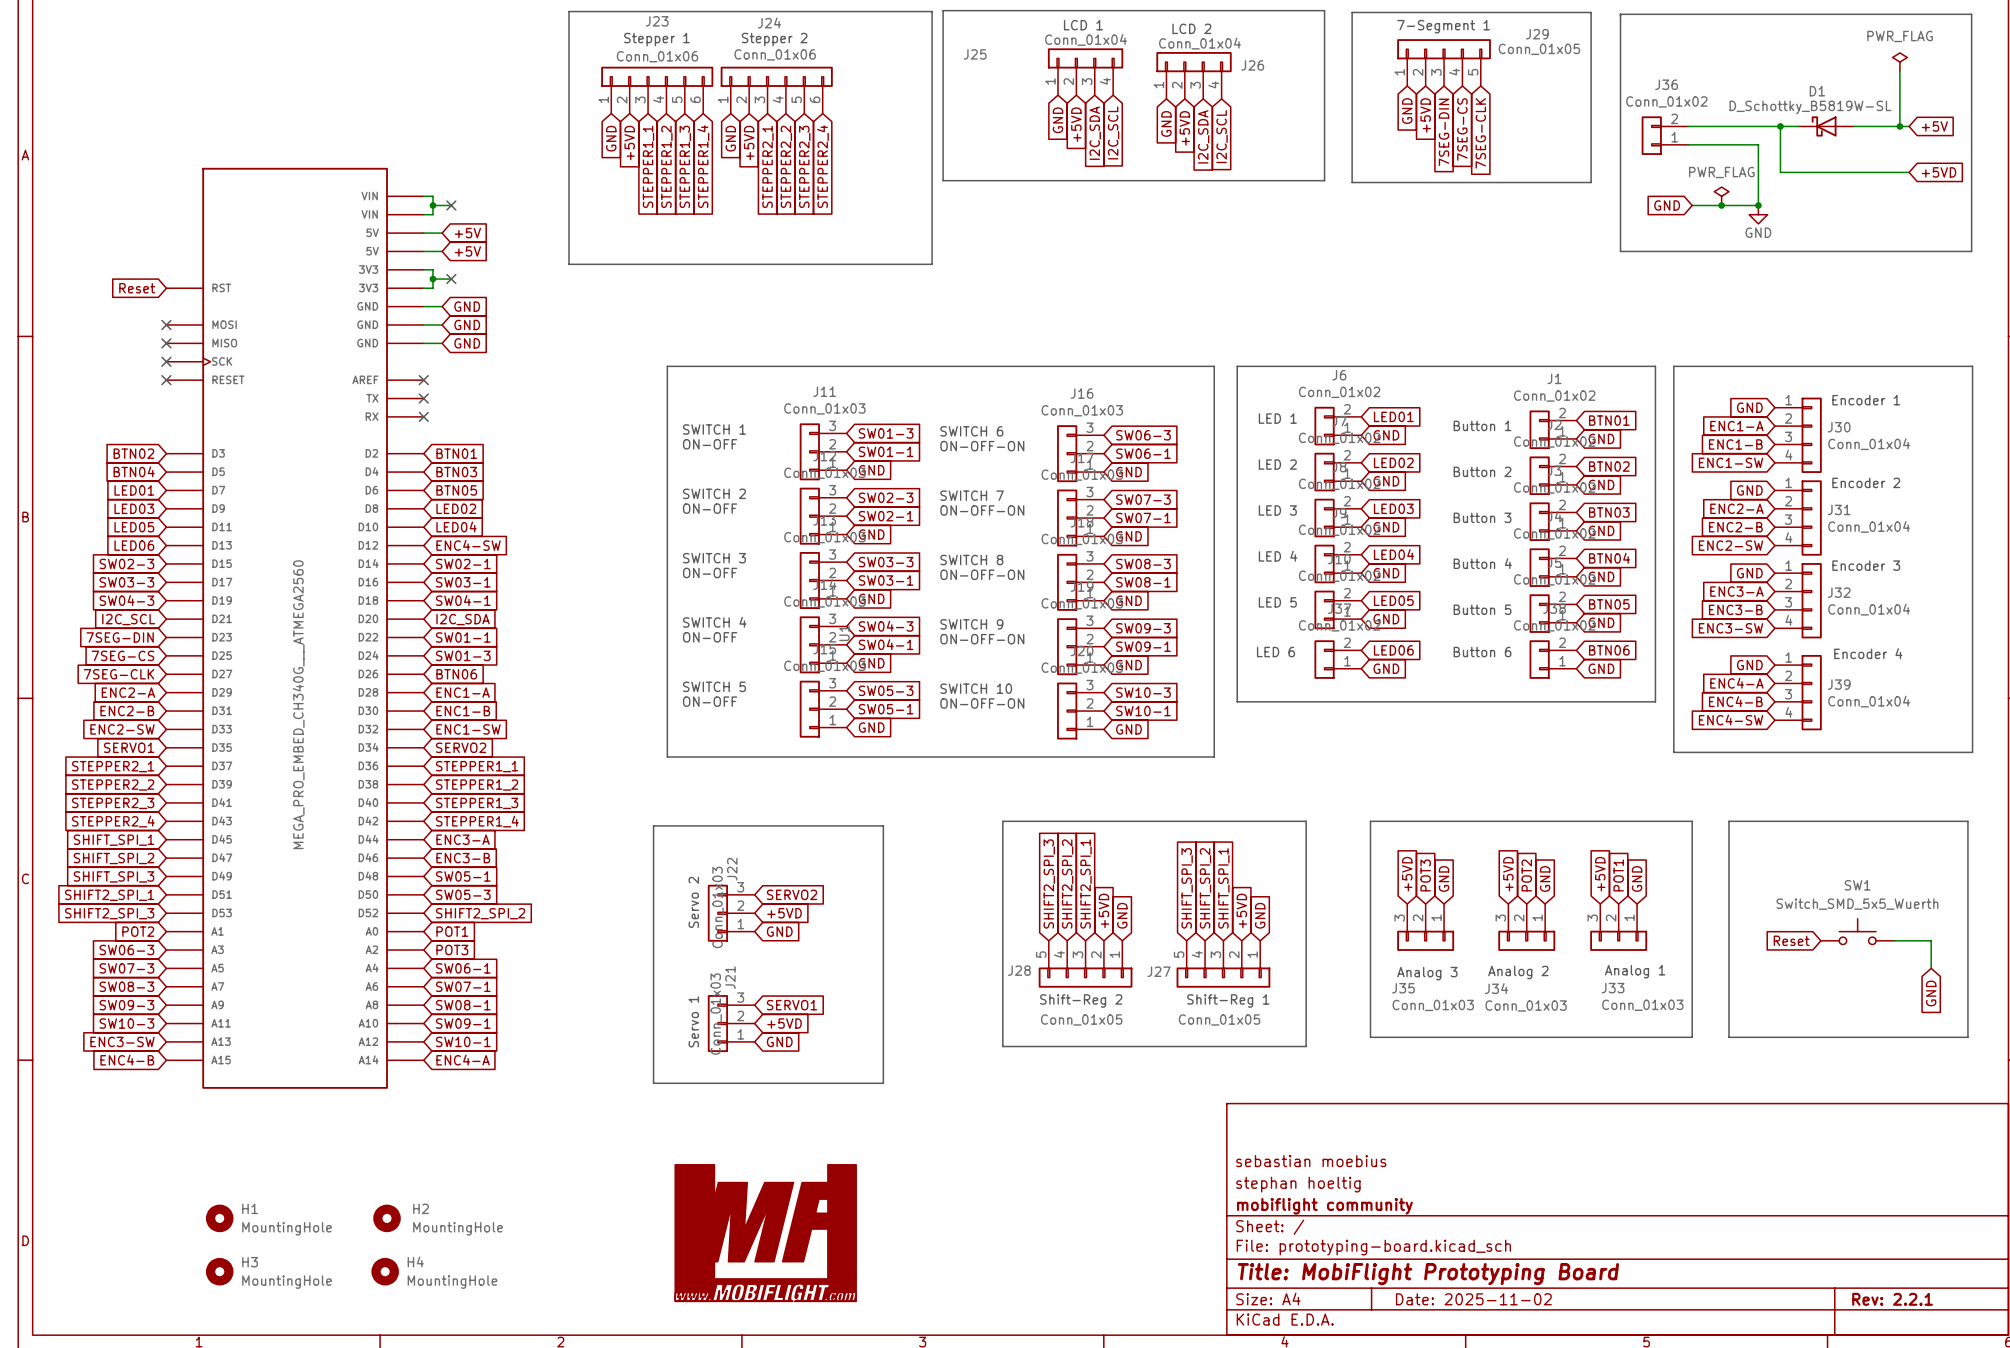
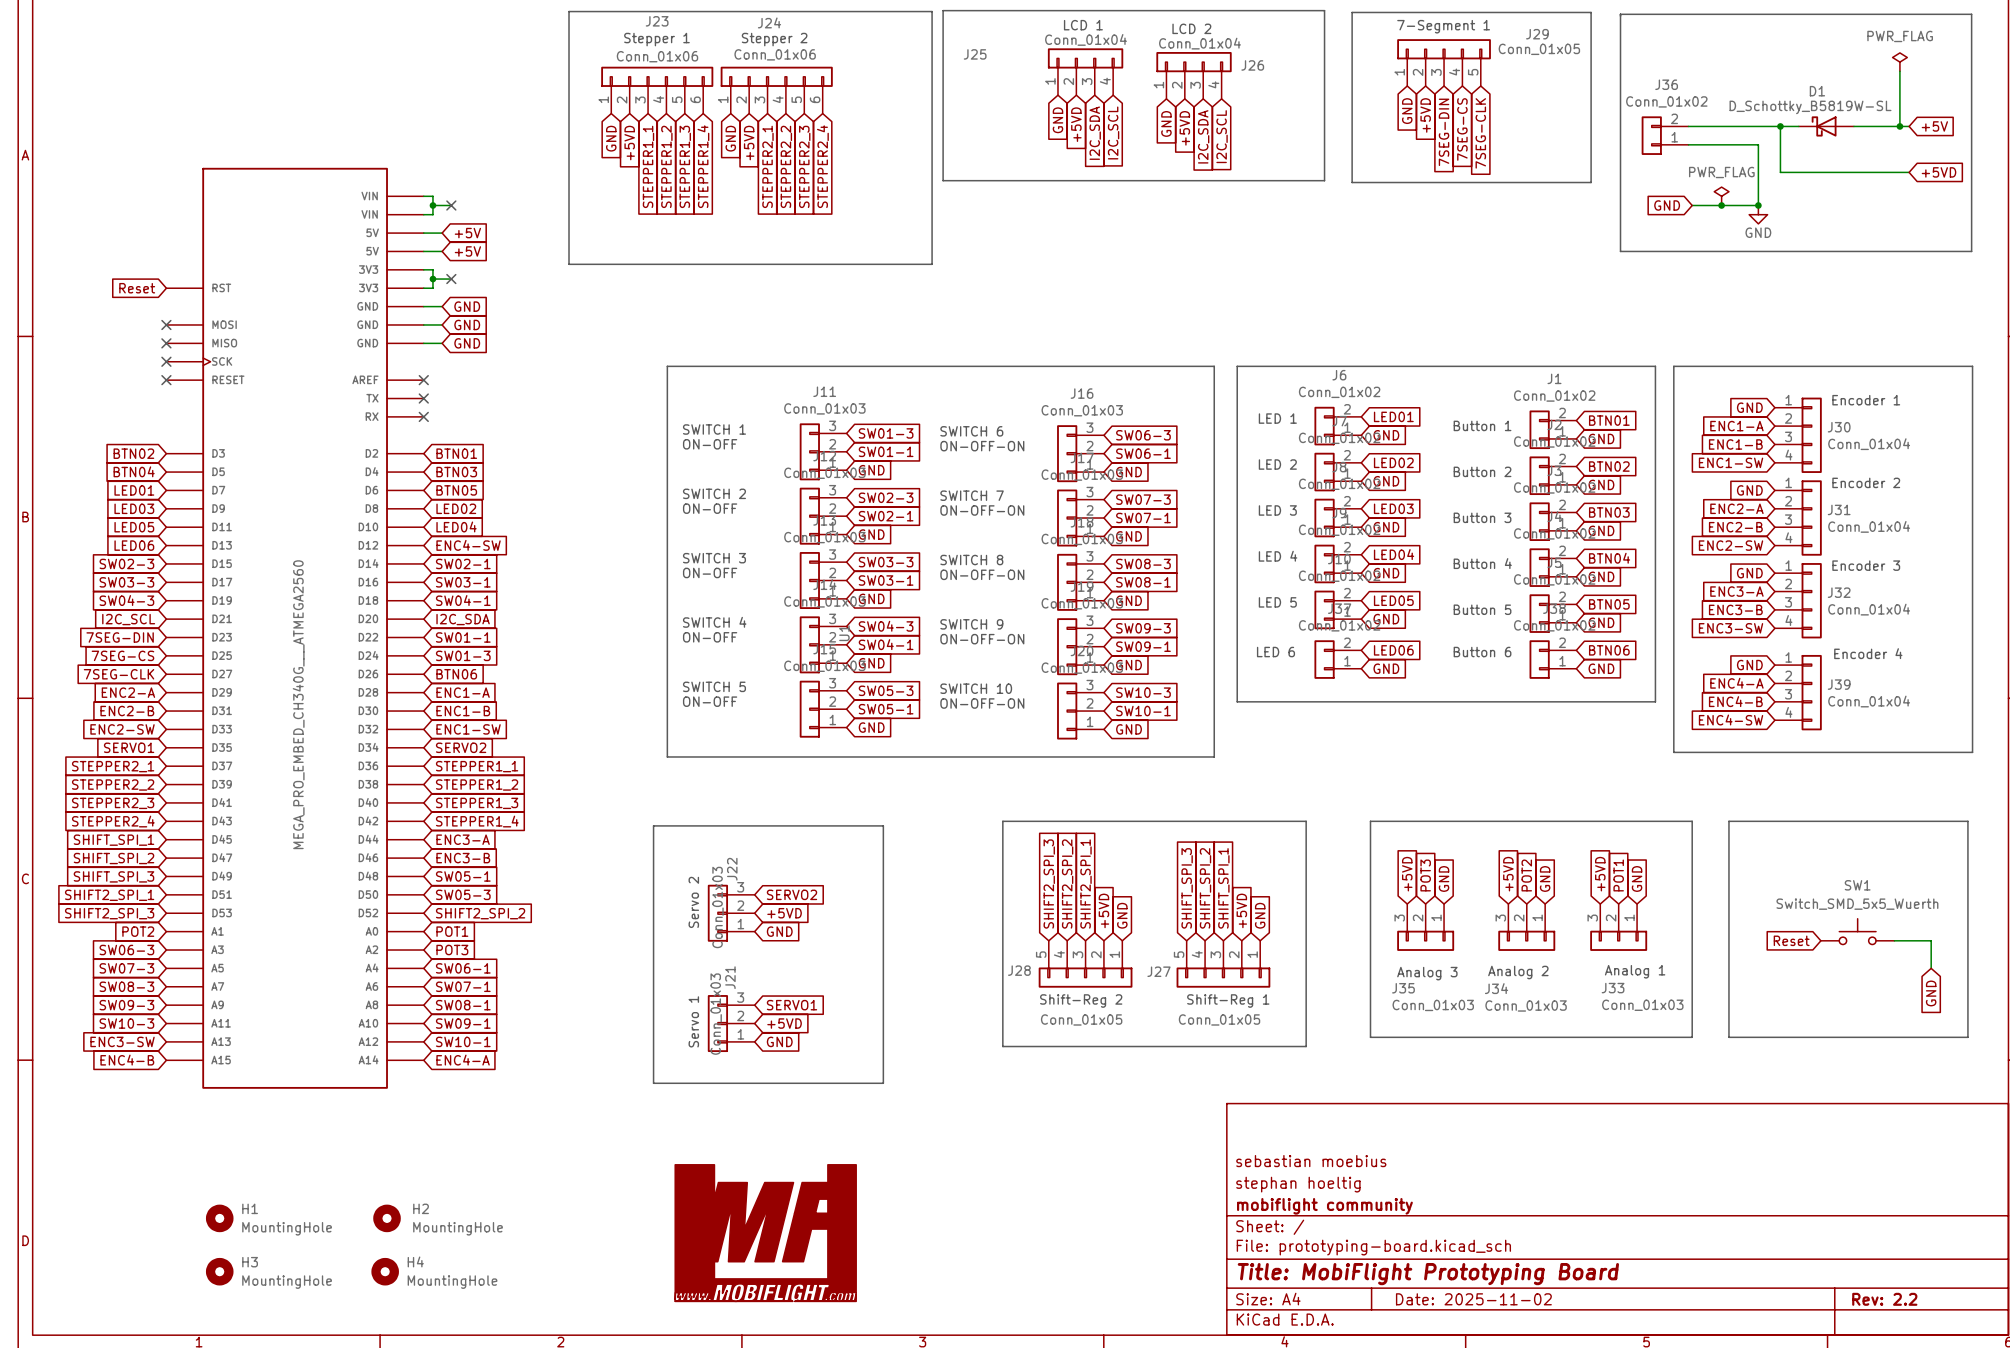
title block: Rev: 2.2.1 (1892, 1299) -> Rev: 2.2 (1884, 1299)

